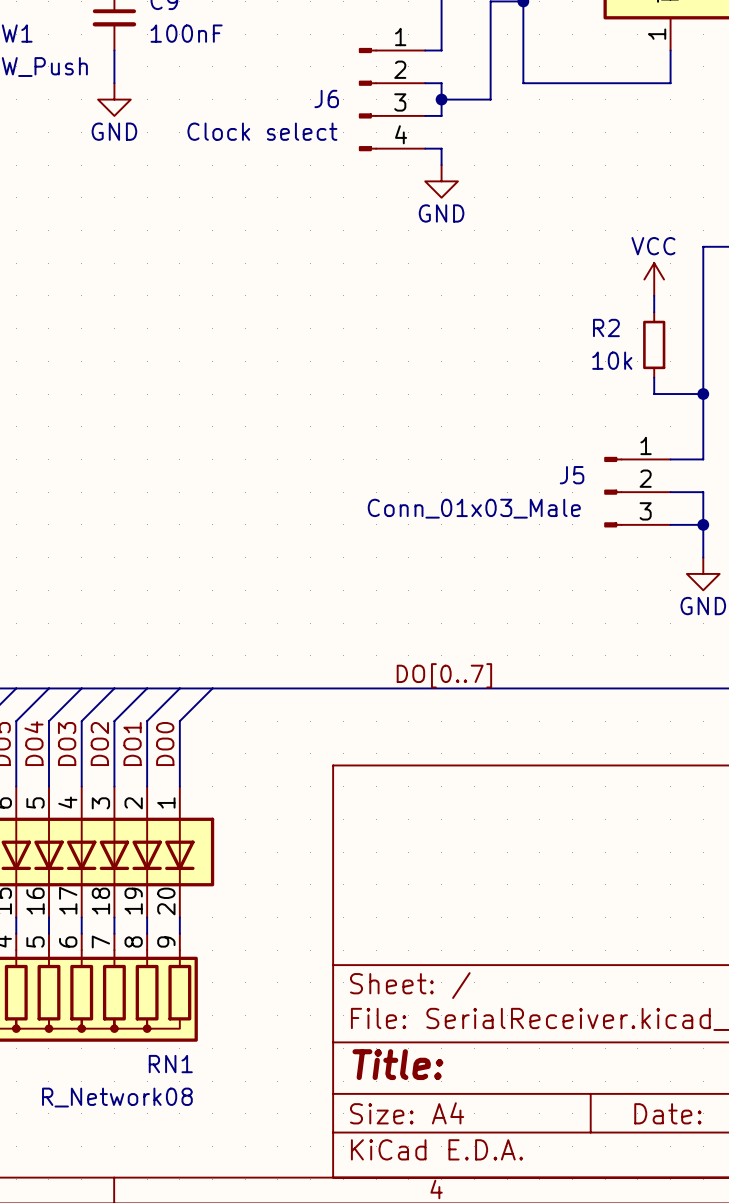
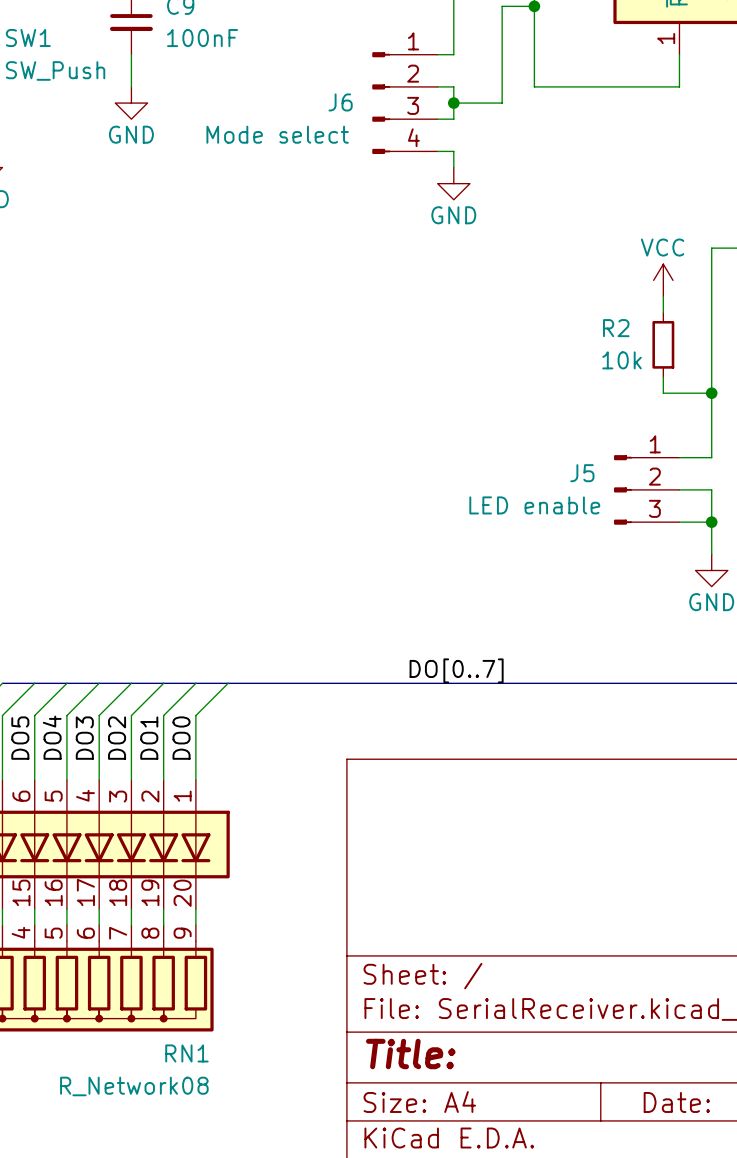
J6 value: Clock select (262, 131) -> Mode select (277, 134)
J5 value: Conn_01x03_Male (474, 508) -> LED enable (534, 505)

